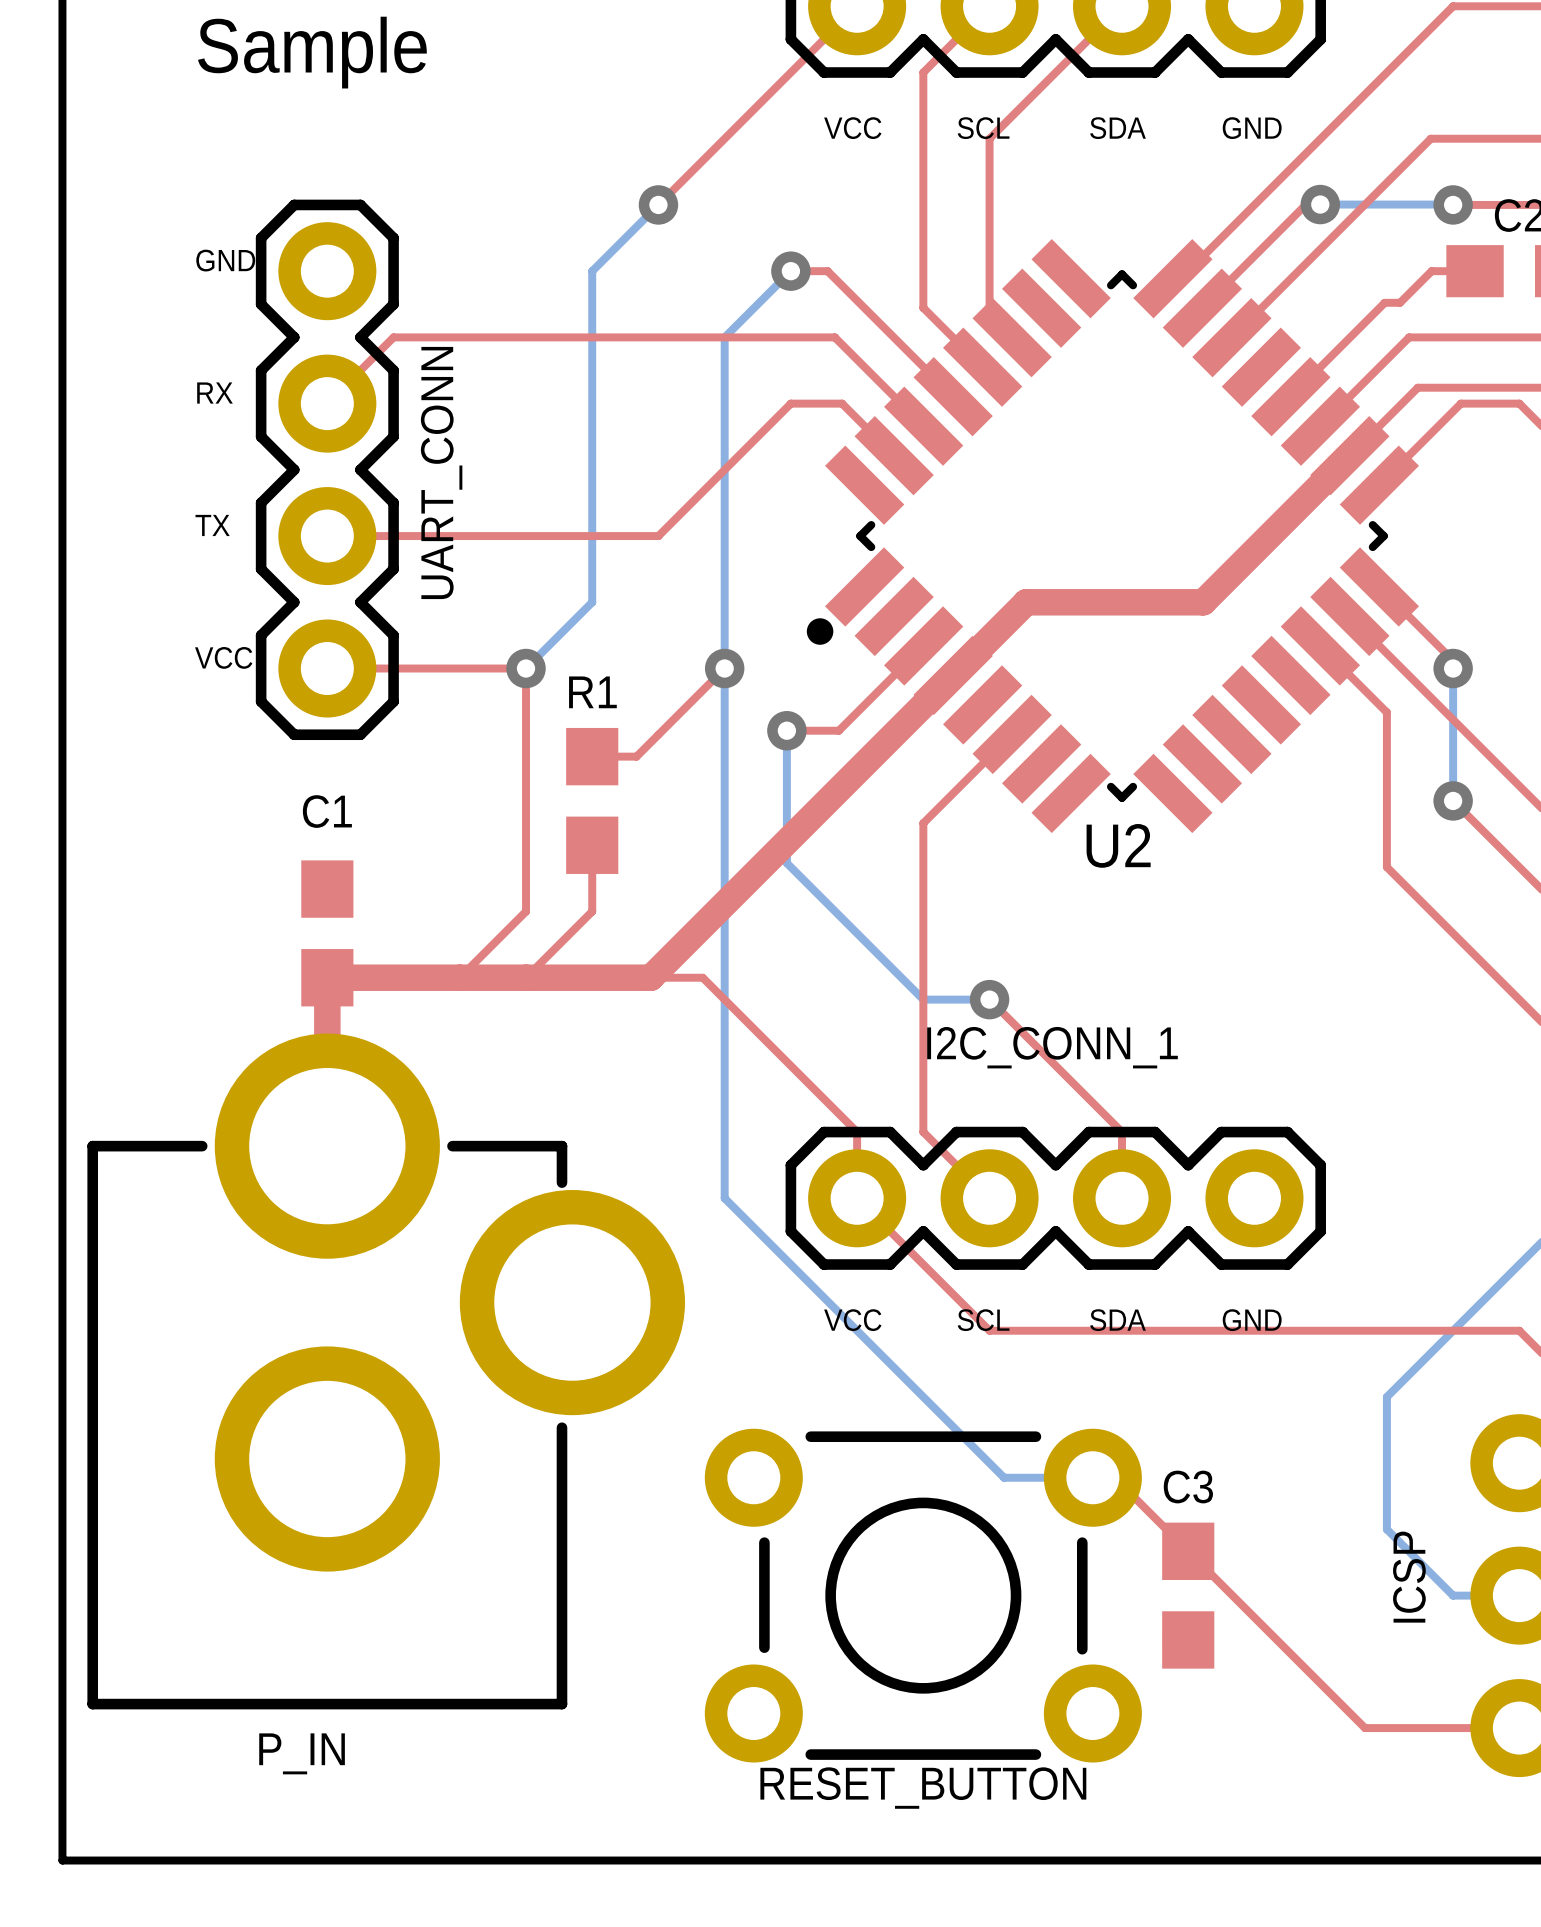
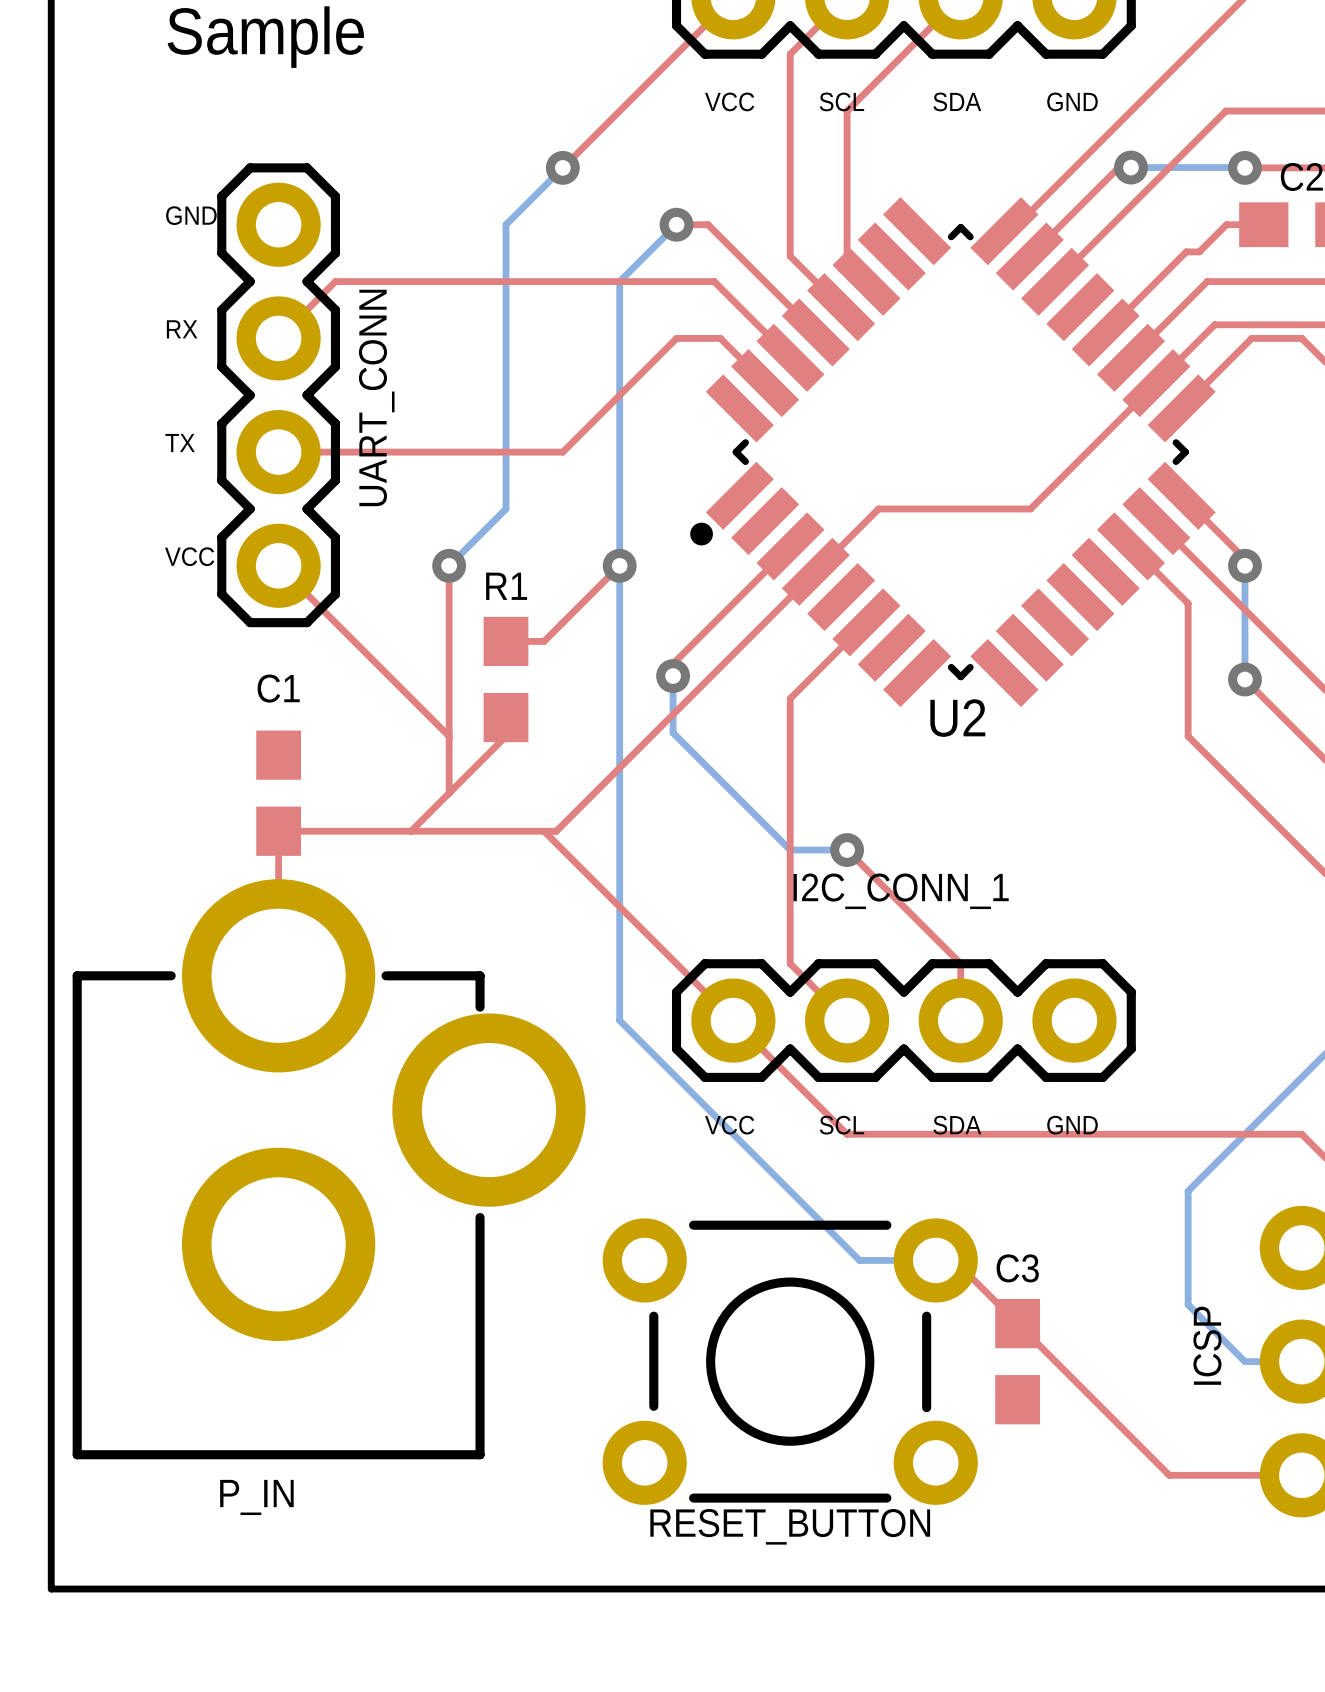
top track width: thick (1349, 455) (1203, 602) (1026, 602) (650, 977) (327, 977) (327, 1146) -> thin (1156, 383) (1030, 508) (878, 508) (556, 831) (278, 831) (278, 975)
top track: (327, 668) (526, 668) -> (278, 565) (449, 736)
top track: (786, 730) (838, 730) -> (673, 676) (673, 663) (717, 619)
bottom track: (786, 730) (786, 796) -> none
via position: (786, 730) -> (673, 676)
top track: (592, 867) (592, 911) (526, 977) -> (506, 736) (411, 831)
top track: (526, 911) (459, 977) -> (449, 774) (449, 793)
top track: (650, 977) (702, 977) (857, 1132) (857, 1198) -> (544, 831) (733, 1020)

